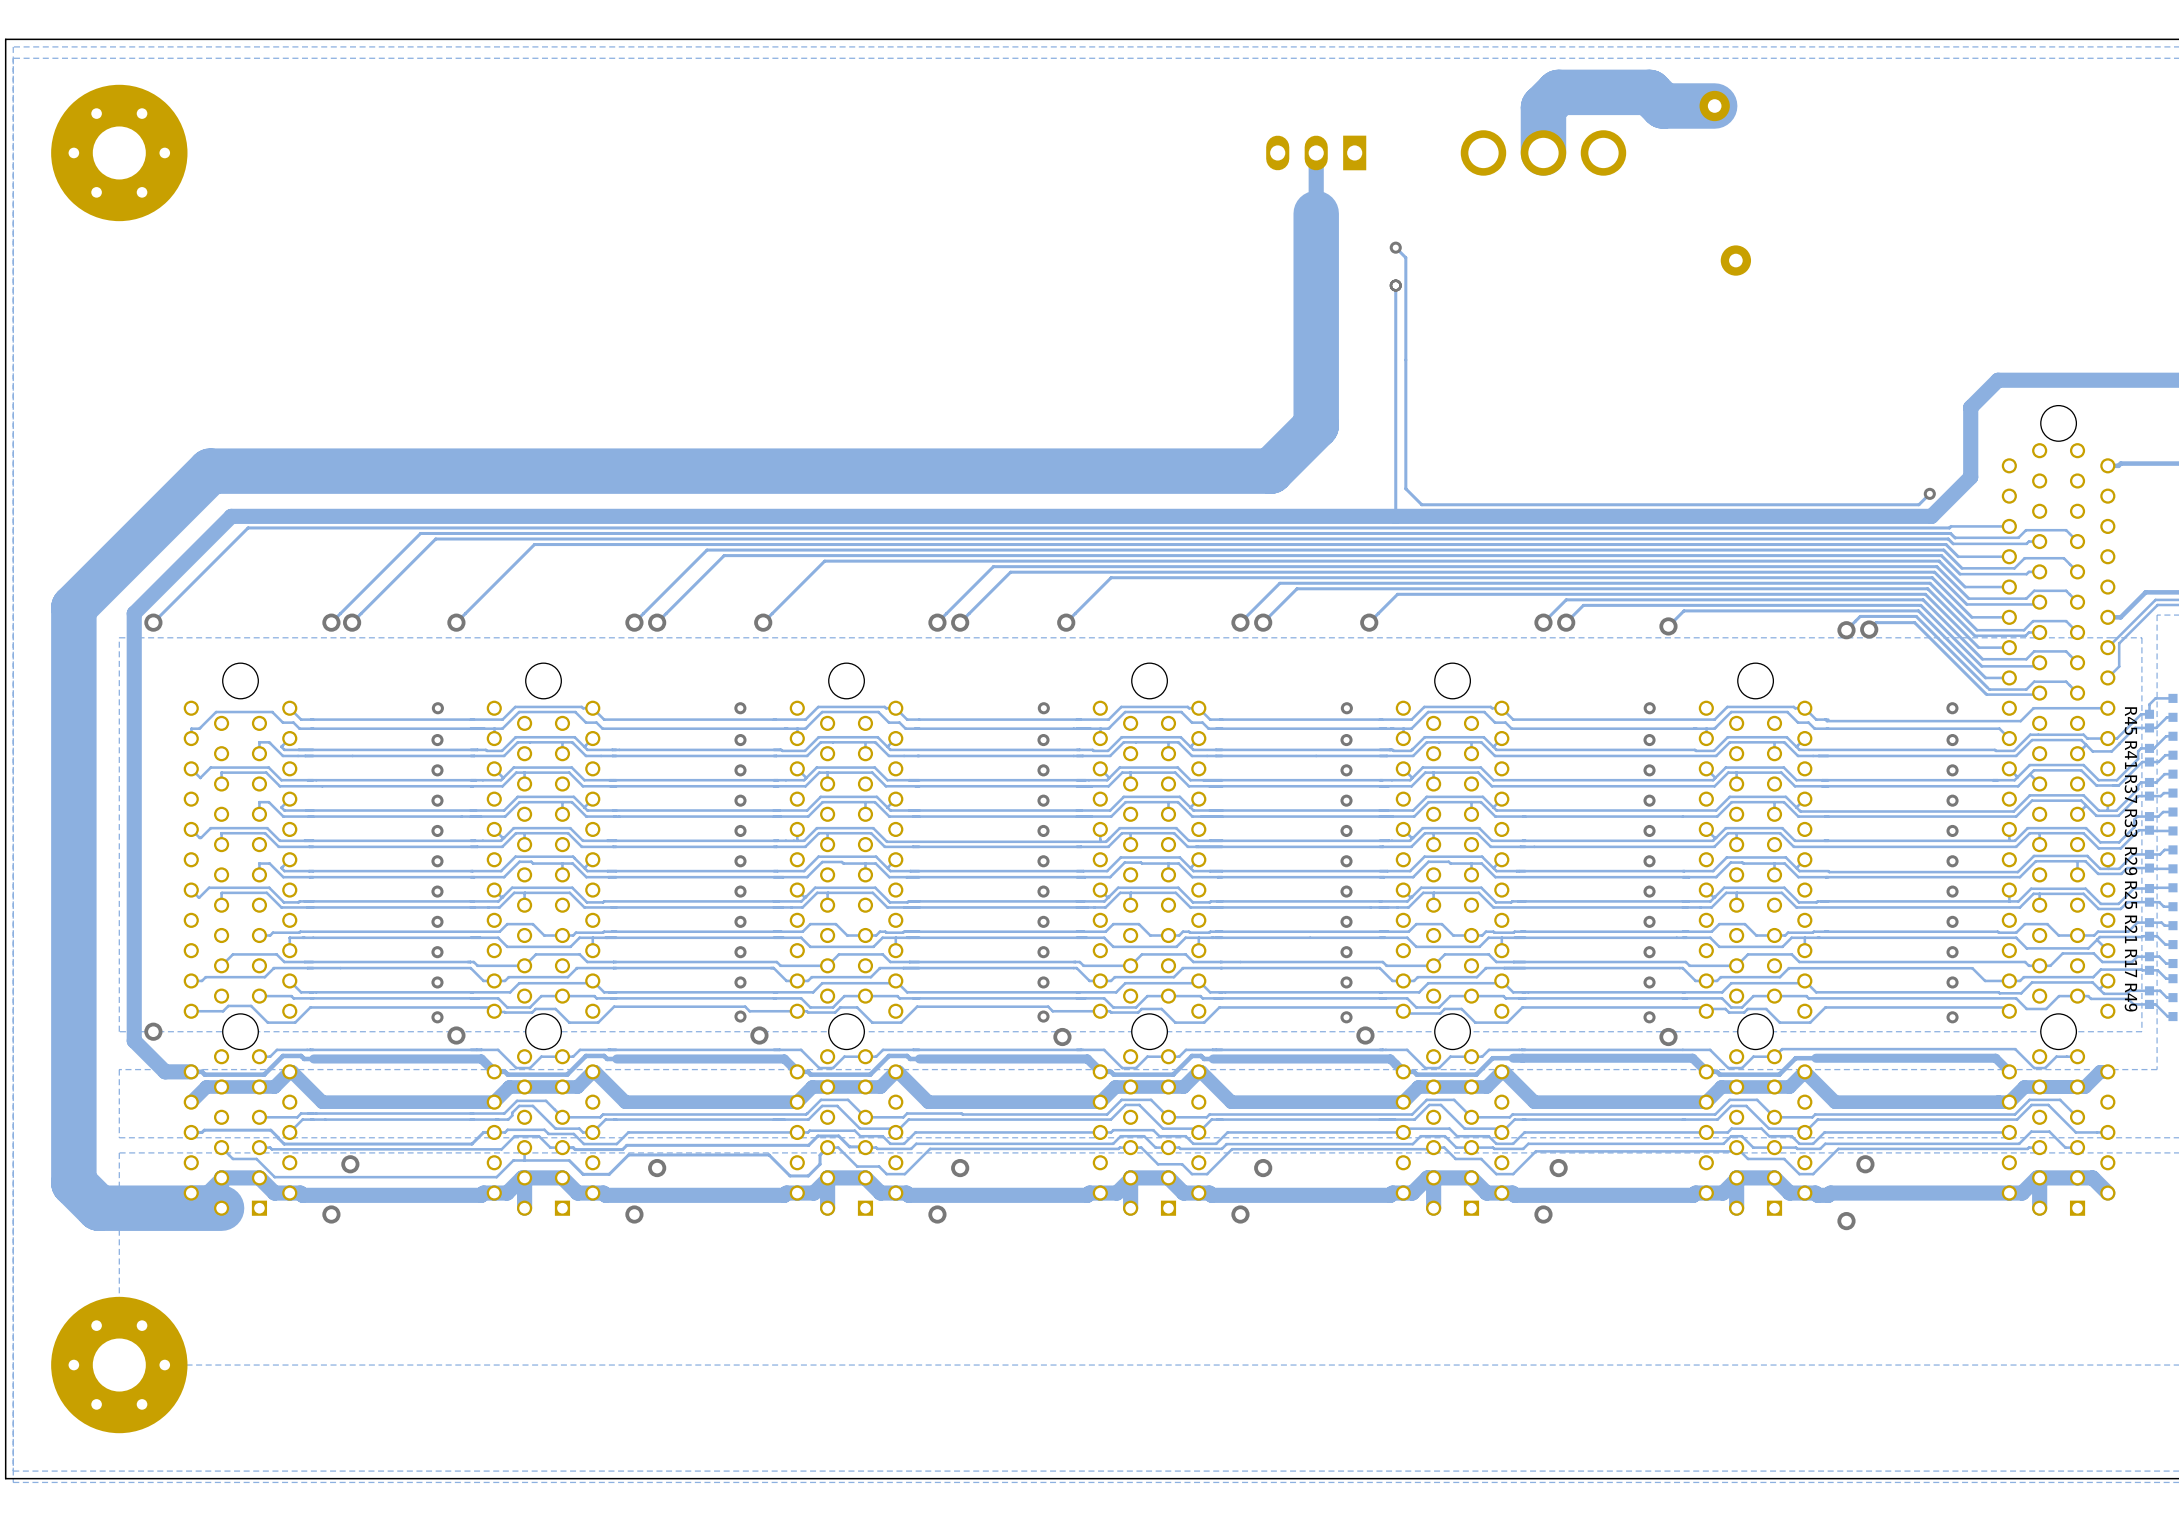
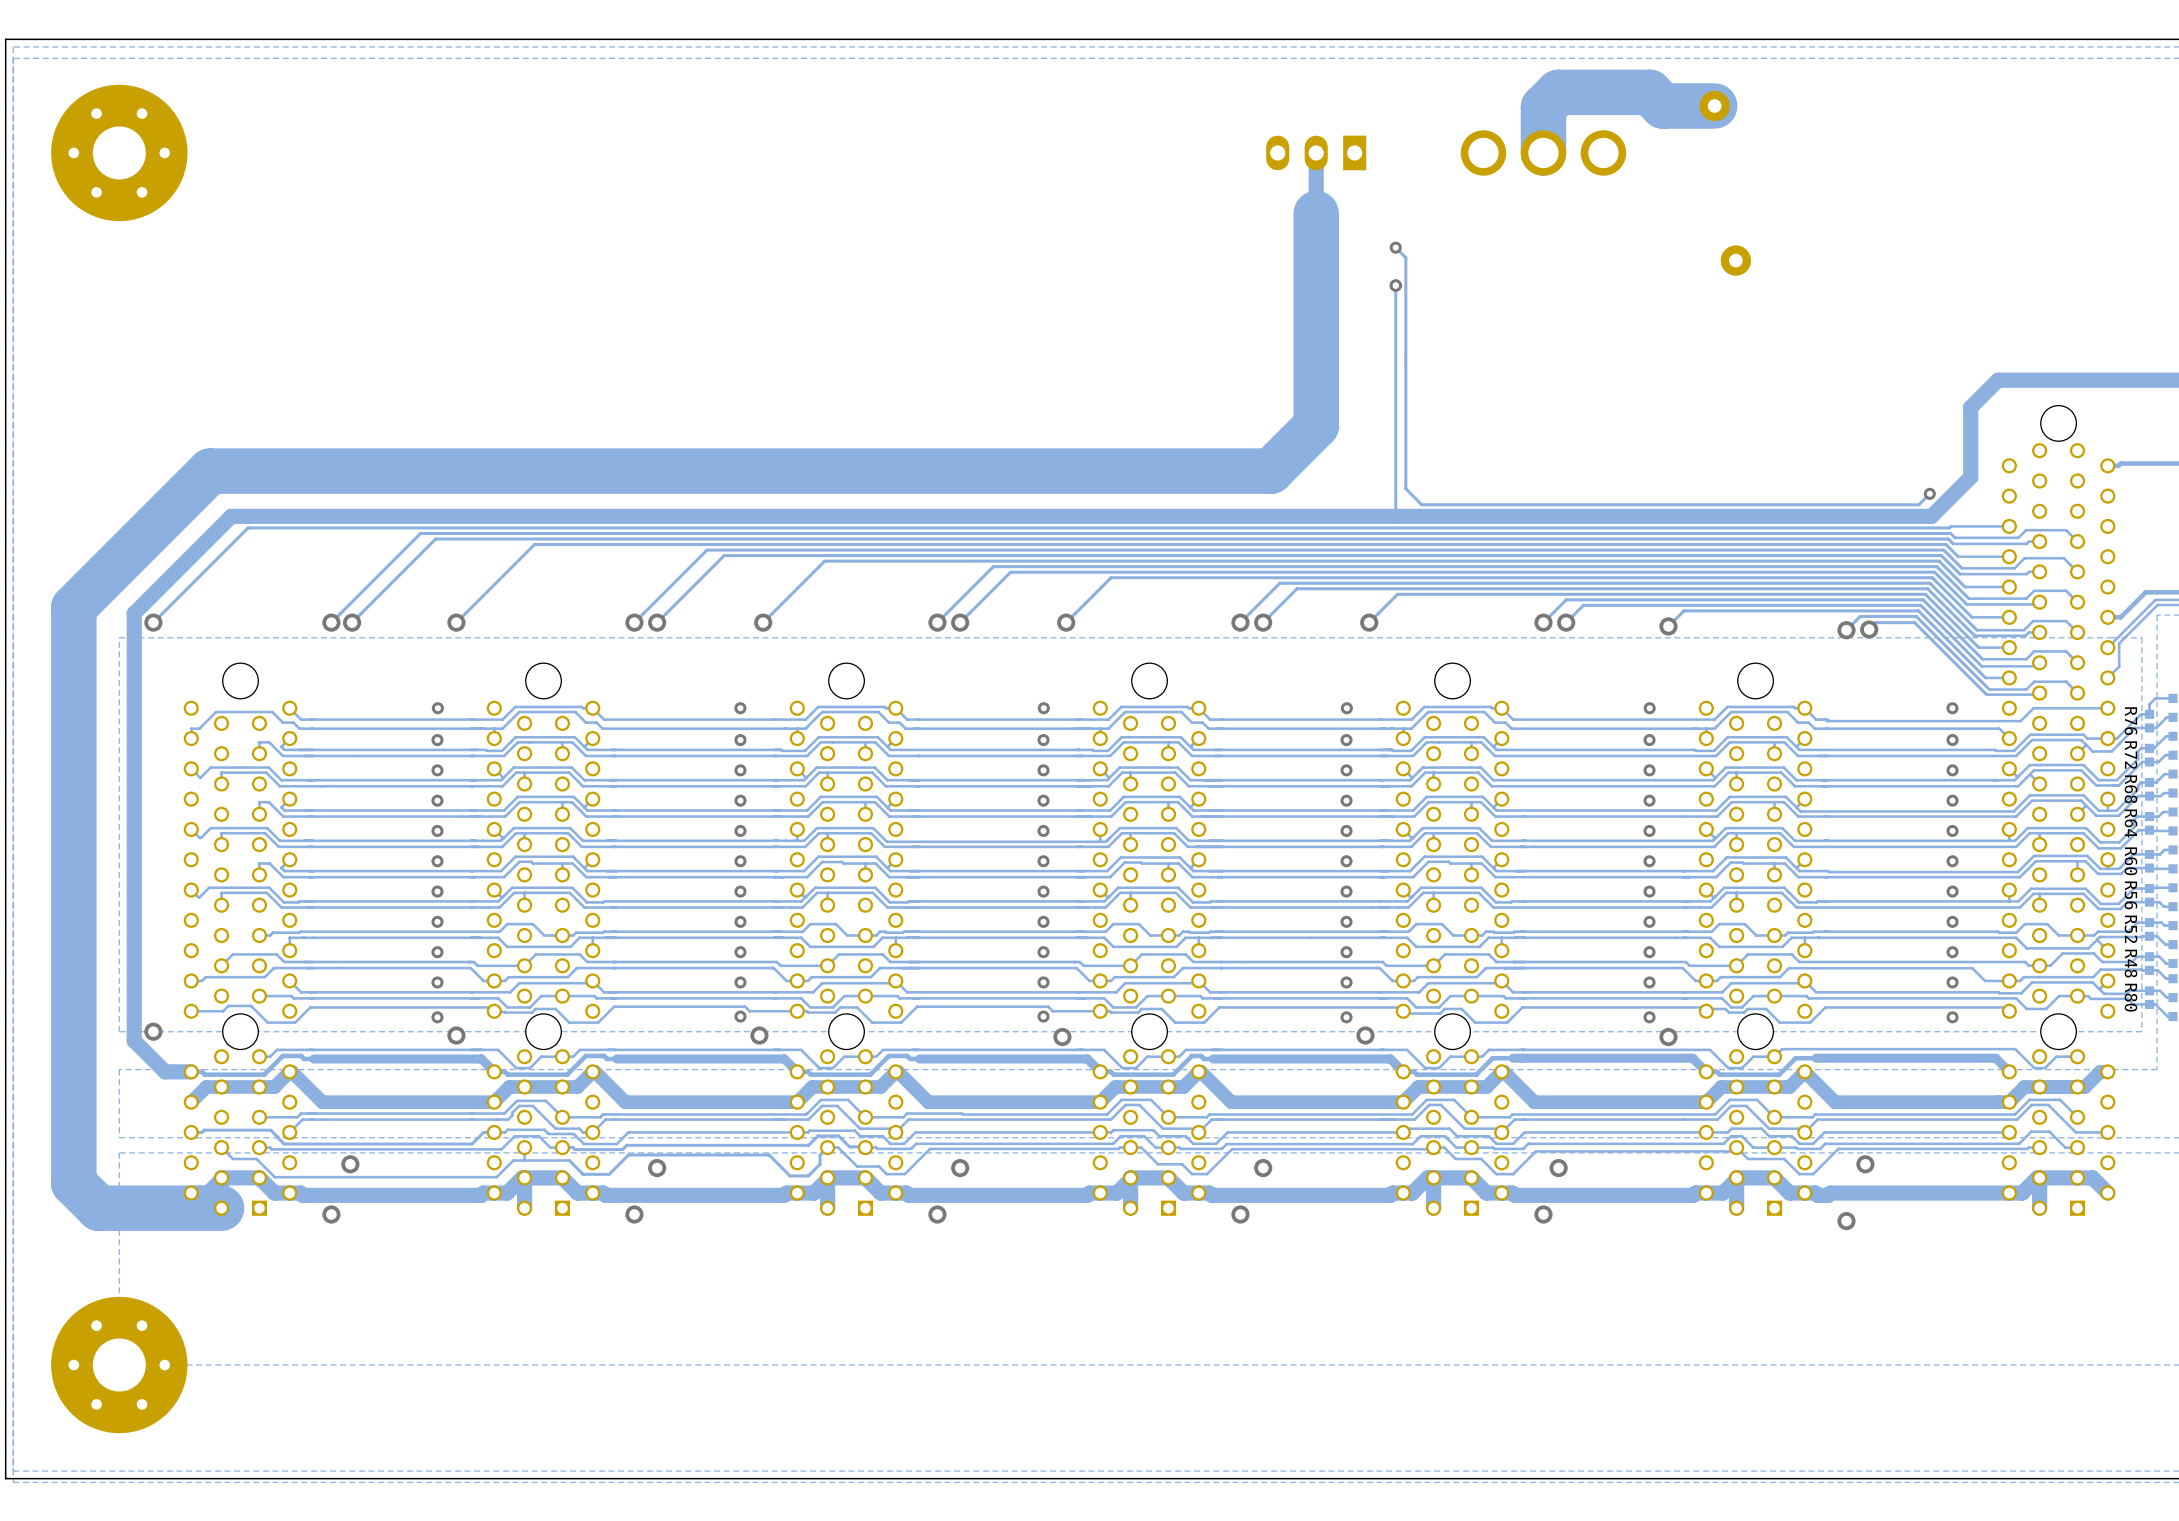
R45 name: R45 (2130, 721) -> R76 (2131, 721)
R41 name: R41 (2131, 755) -> R72 (2131, 755)
R37 name: R37 (2131, 789) -> R68 (2131, 789)
R33 name: R33 (2131, 823) -> R64 (2131, 823)
R29 name: R29 (2131, 861) -> R60 (2131, 861)
R25 name: R25 (2131, 895) -> R56 (2131, 895)
R21 name: R21 (2131, 929) -> R52 (2131, 929)
R17 name: R17 (2131, 963) -> R48 (2131, 963)
R49 name: R49 (2131, 997) -> R80 (2131, 997)

